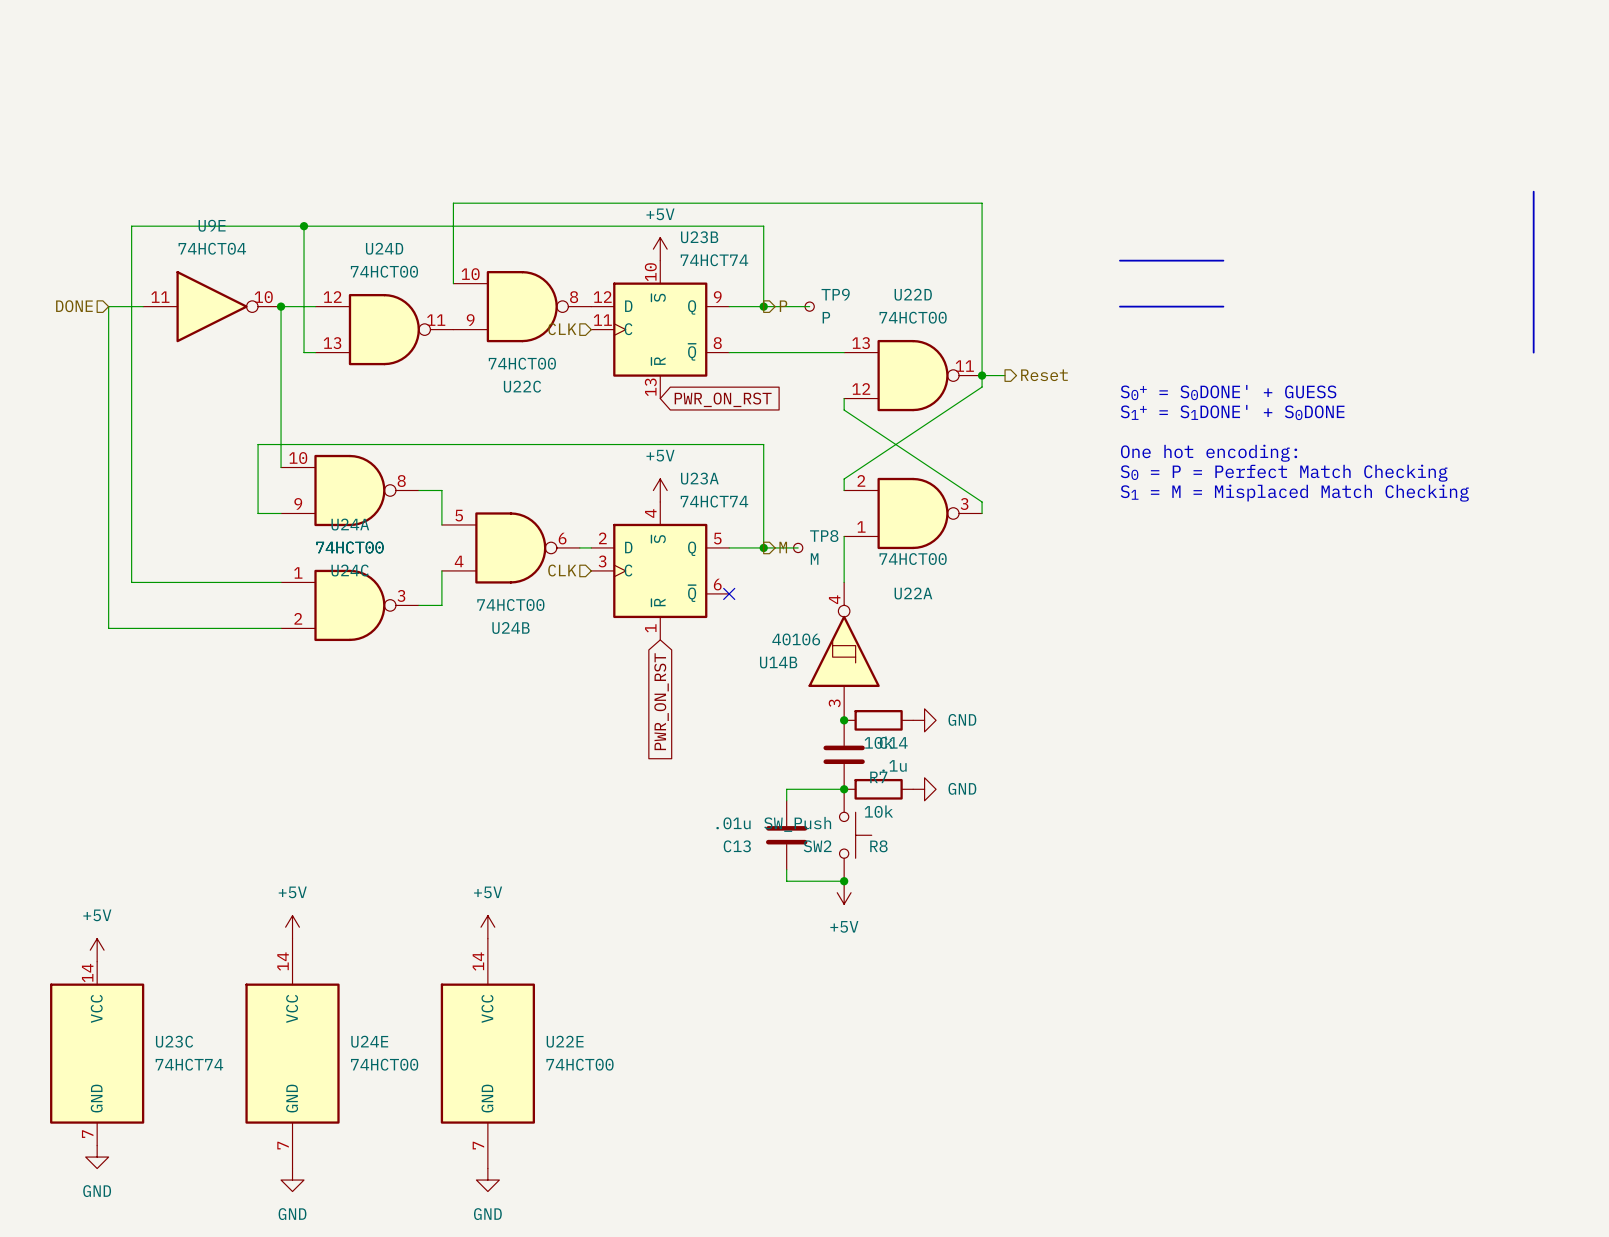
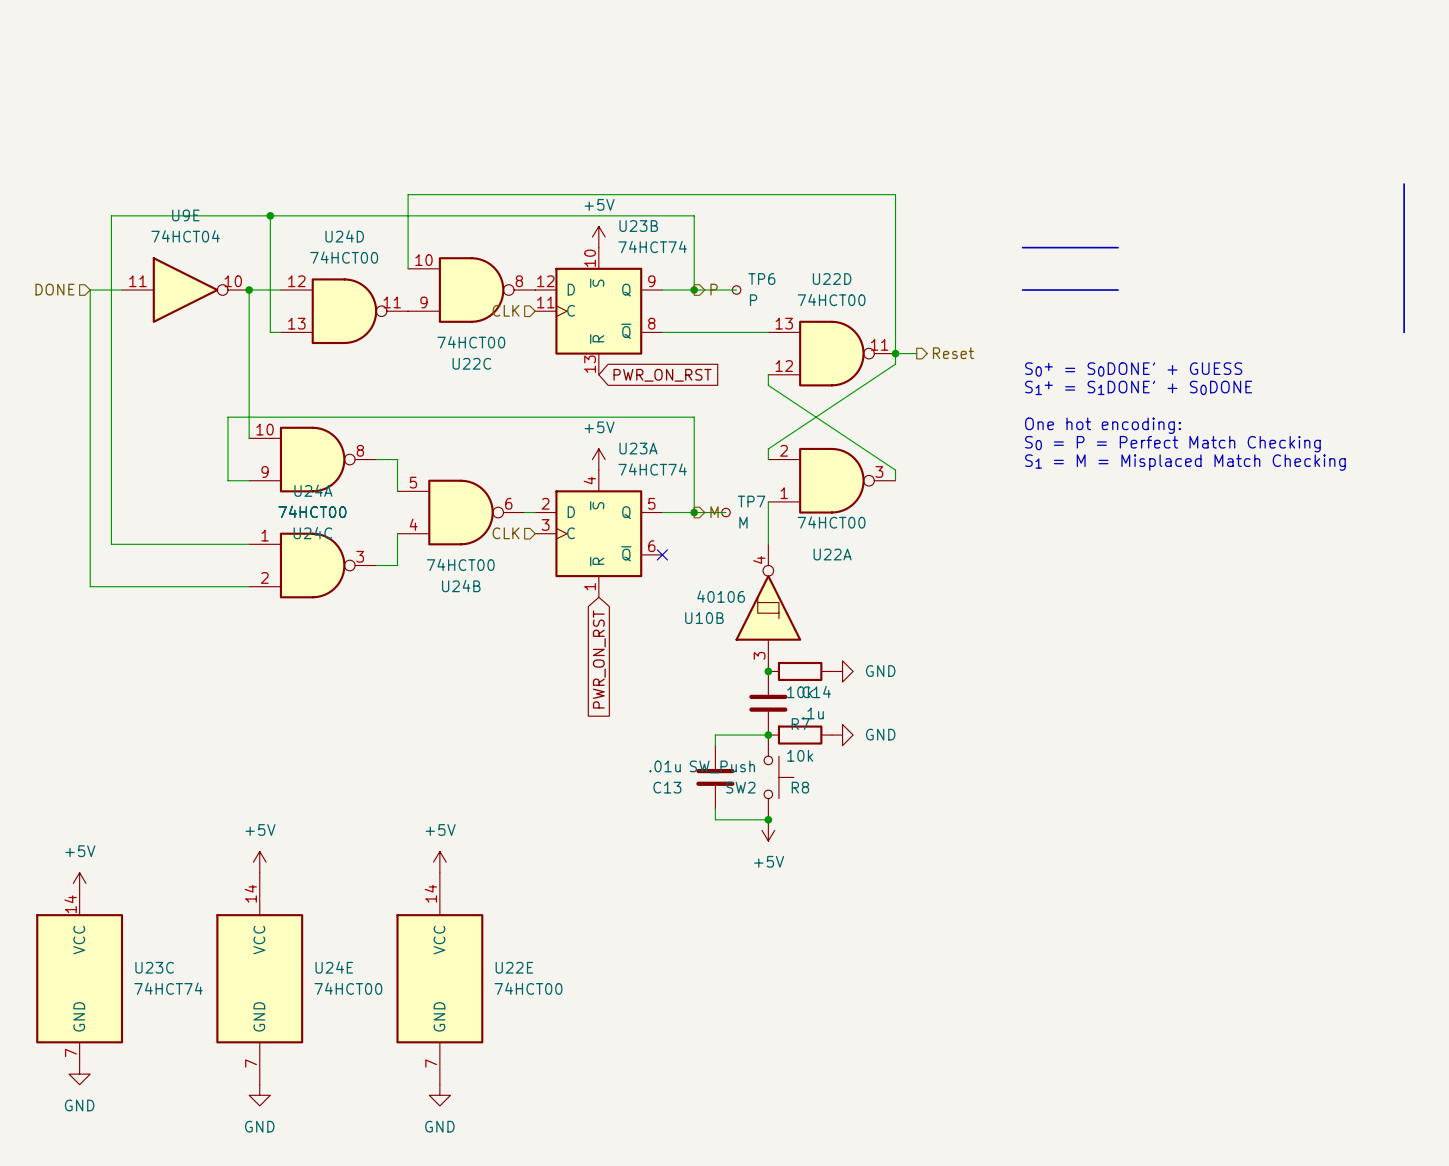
TP9 name: TP9 (835, 294) -> TP6 (761, 279)
TP8 name: TP8 (824, 536) -> TP7 (751, 501)
U14B name: U14B (778, 662) -> U10B (704, 618)

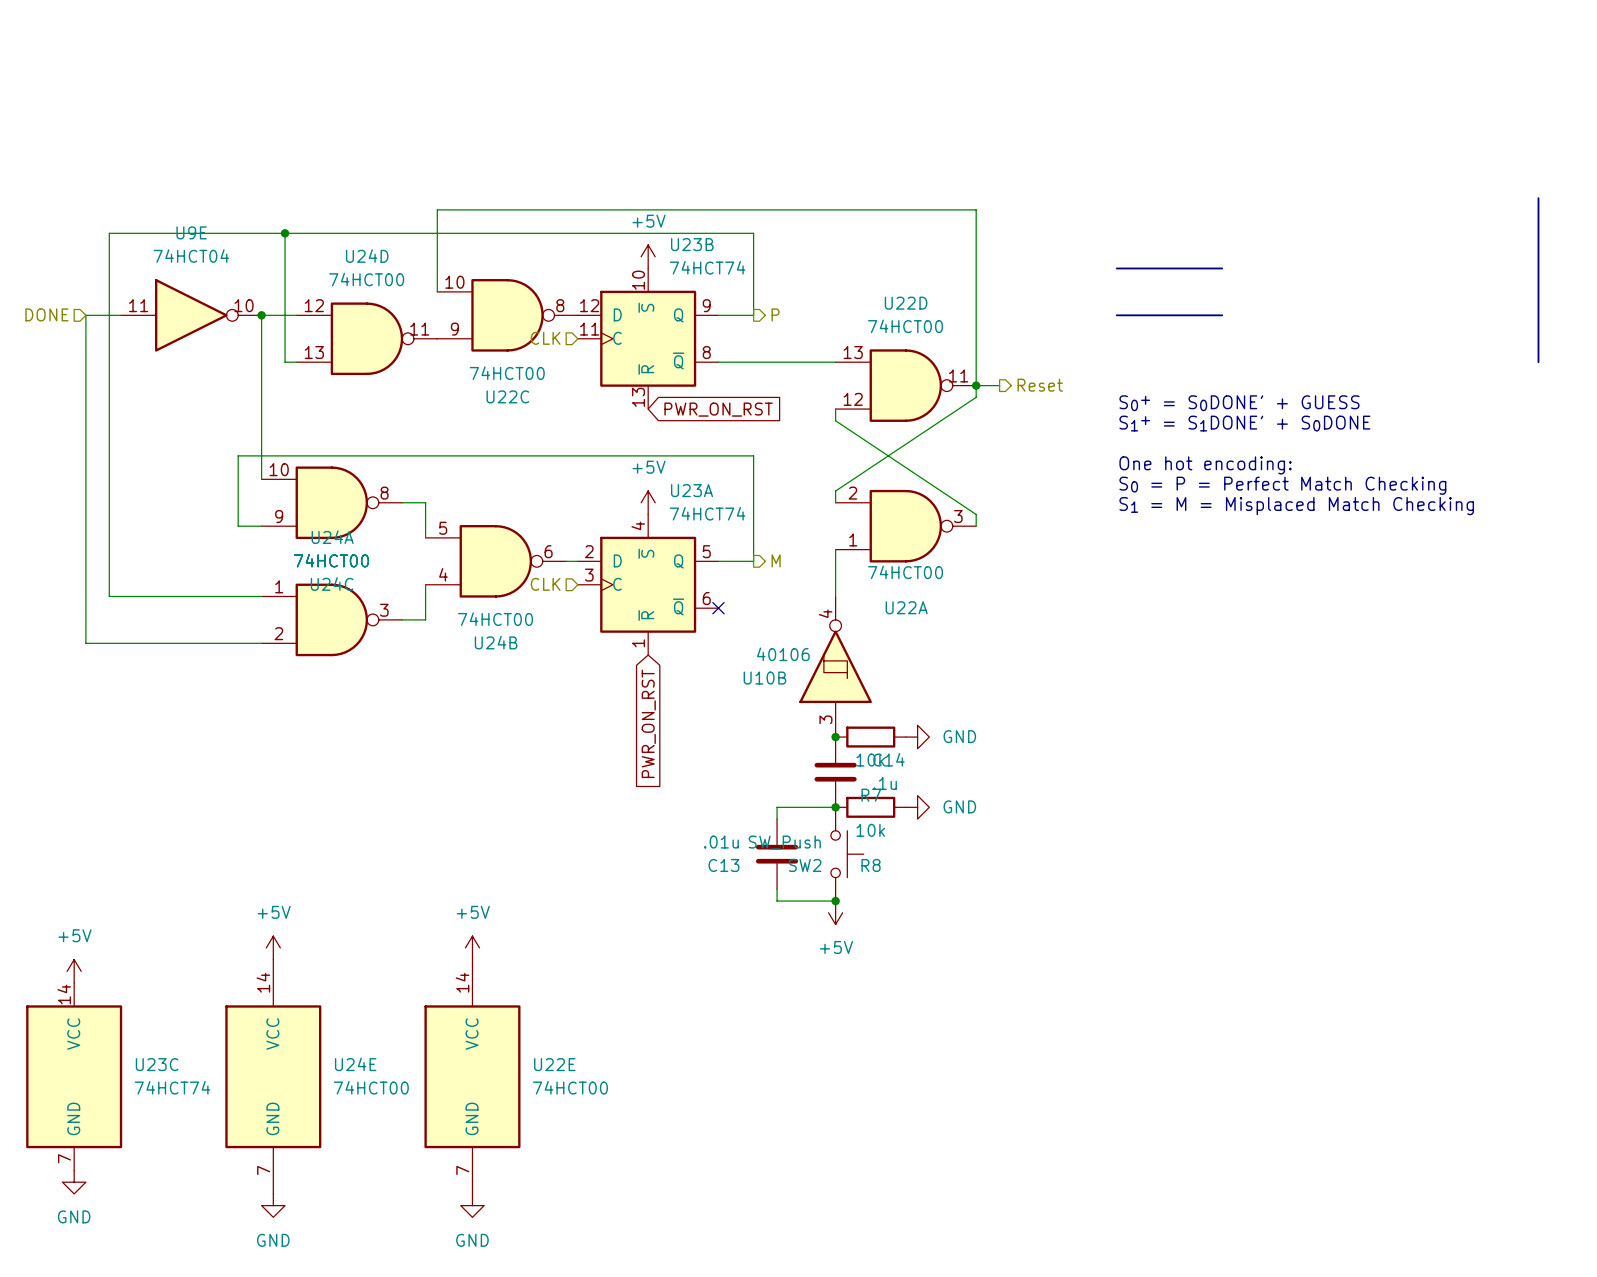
wire: (694, 290) (736, 290) -> none
junction: (694, 290) -> none
TP6: P (736, 290) -> none
wire: (694, 512) (725, 512) -> none
junction: (694, 512) -> none
TP7: M (725, 512) -> none

